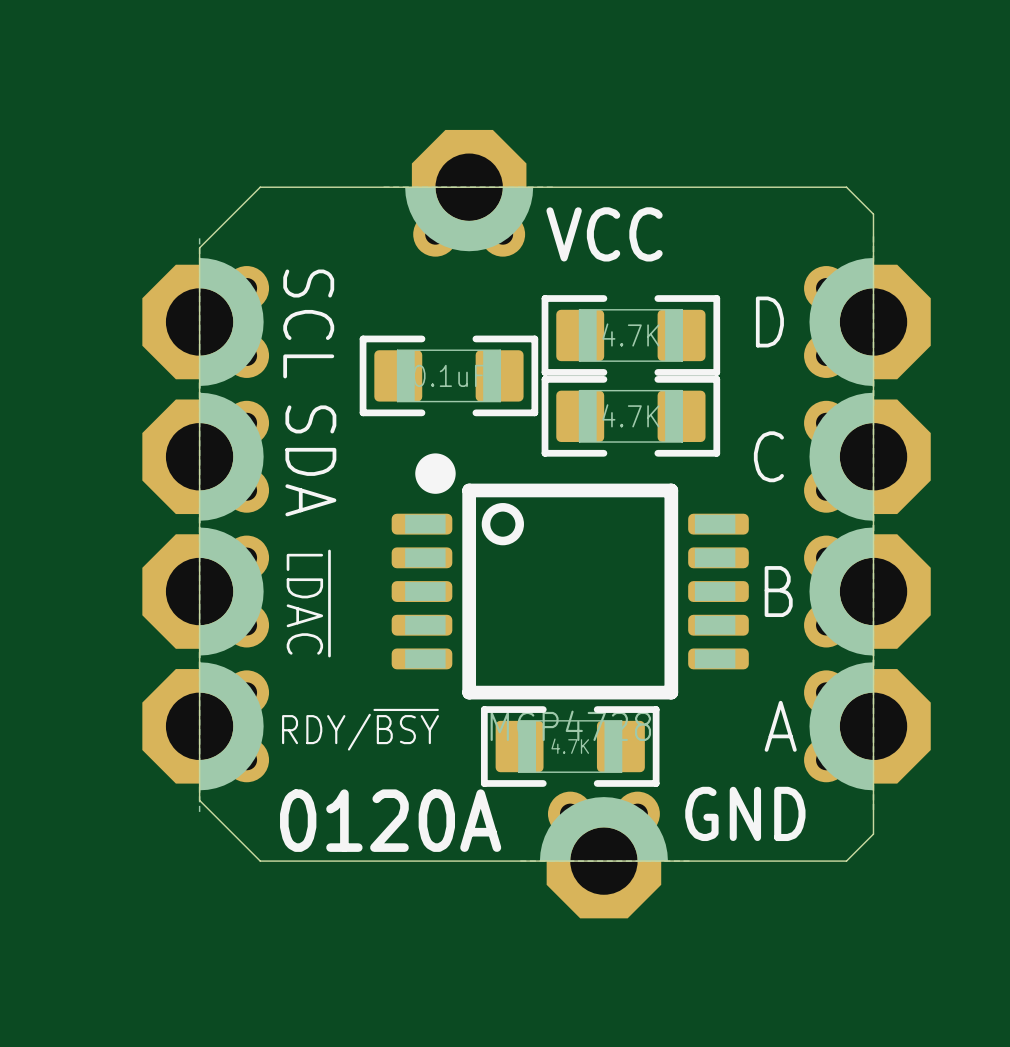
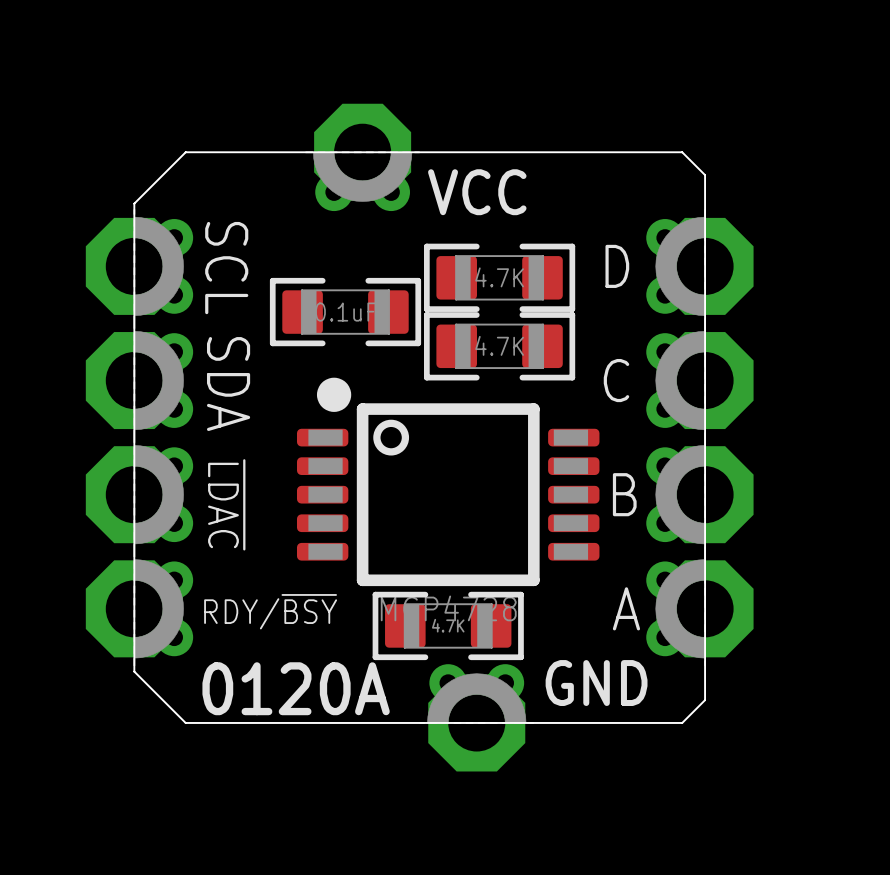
VCC footprint: [383, 129, 556, 257] -> [305, 103, 420, 212]
SCL footprint: [142, 236, 270, 408] -> [85, 209, 194, 324]
D footprint: [804, 236, 931, 408] -> [646, 209, 754, 324]
SDA footprint: [142, 370, 270, 543] -> [85, 323, 194, 438]
C footprint: [804, 370, 931, 543] -> [646, 323, 754, 438]
~{LDAC} footprint: [142, 505, 270, 678] -> [85, 437, 194, 553]
B footprint: [804, 505, 931, 678] -> [646, 437, 754, 553]
RDY/~{BSY} footprint: [142, 640, 270, 813] -> [85, 551, 194, 667]
A footprint: [804, 640, 931, 813] -> [646, 551, 754, 667]
GND footprint: [518, 791, 690, 919] -> [419, 664, 535, 772]

